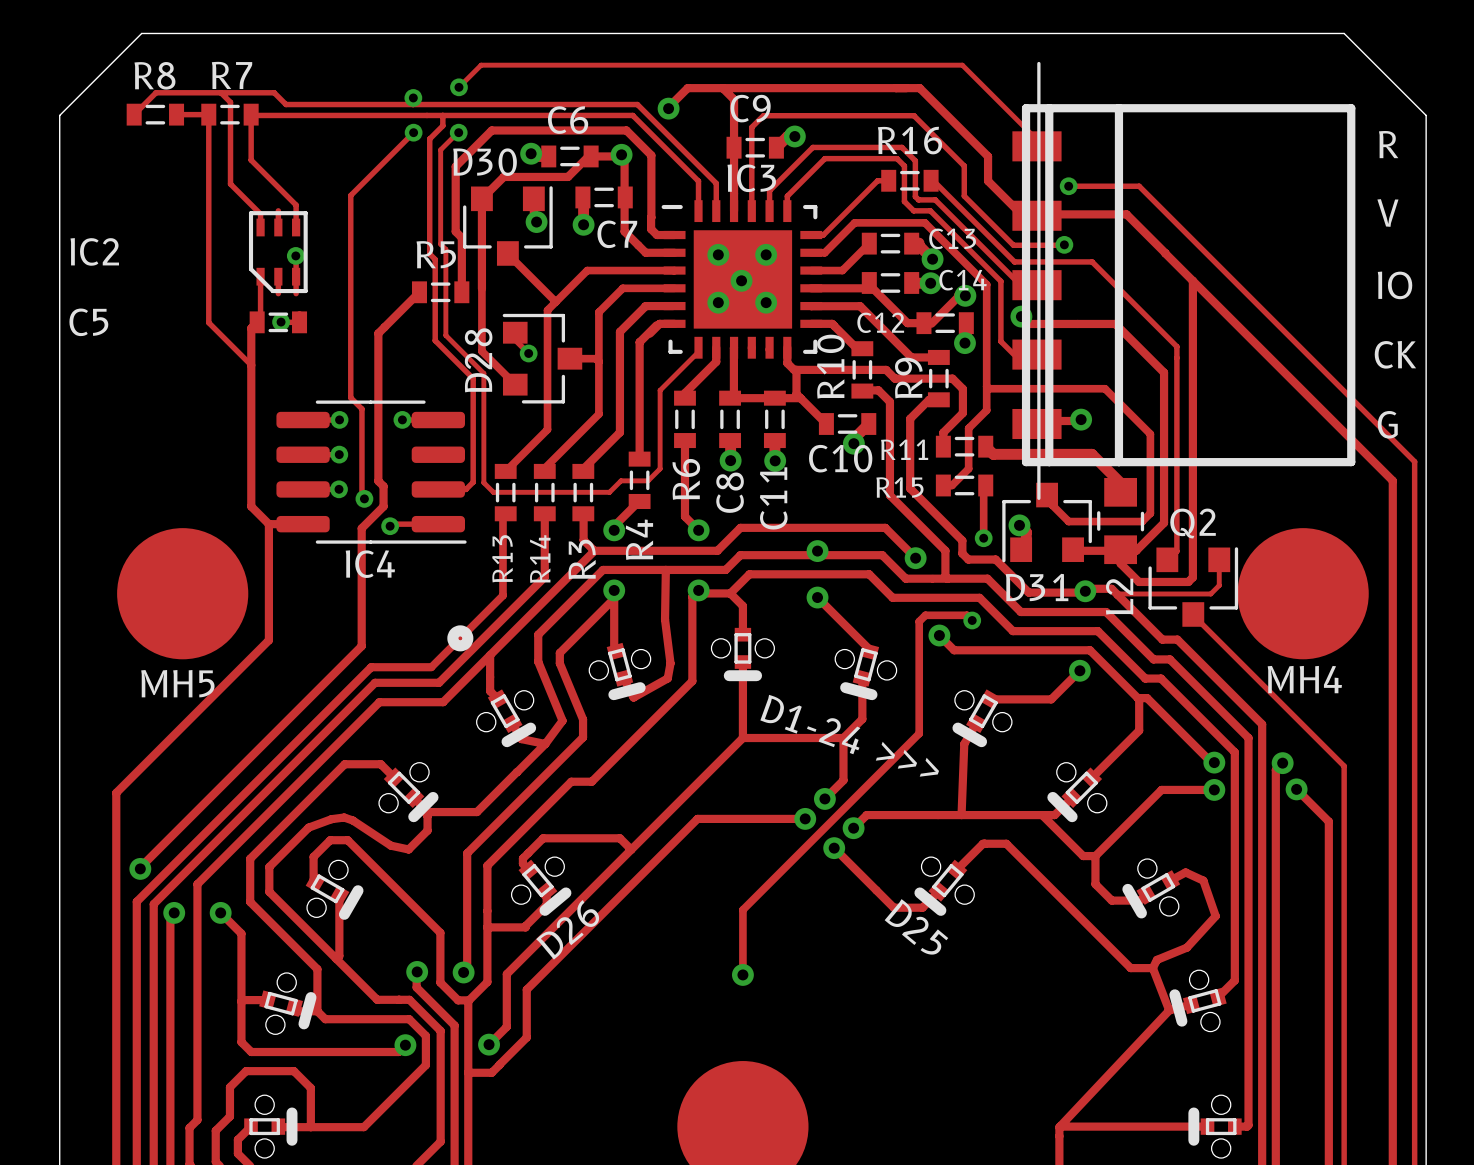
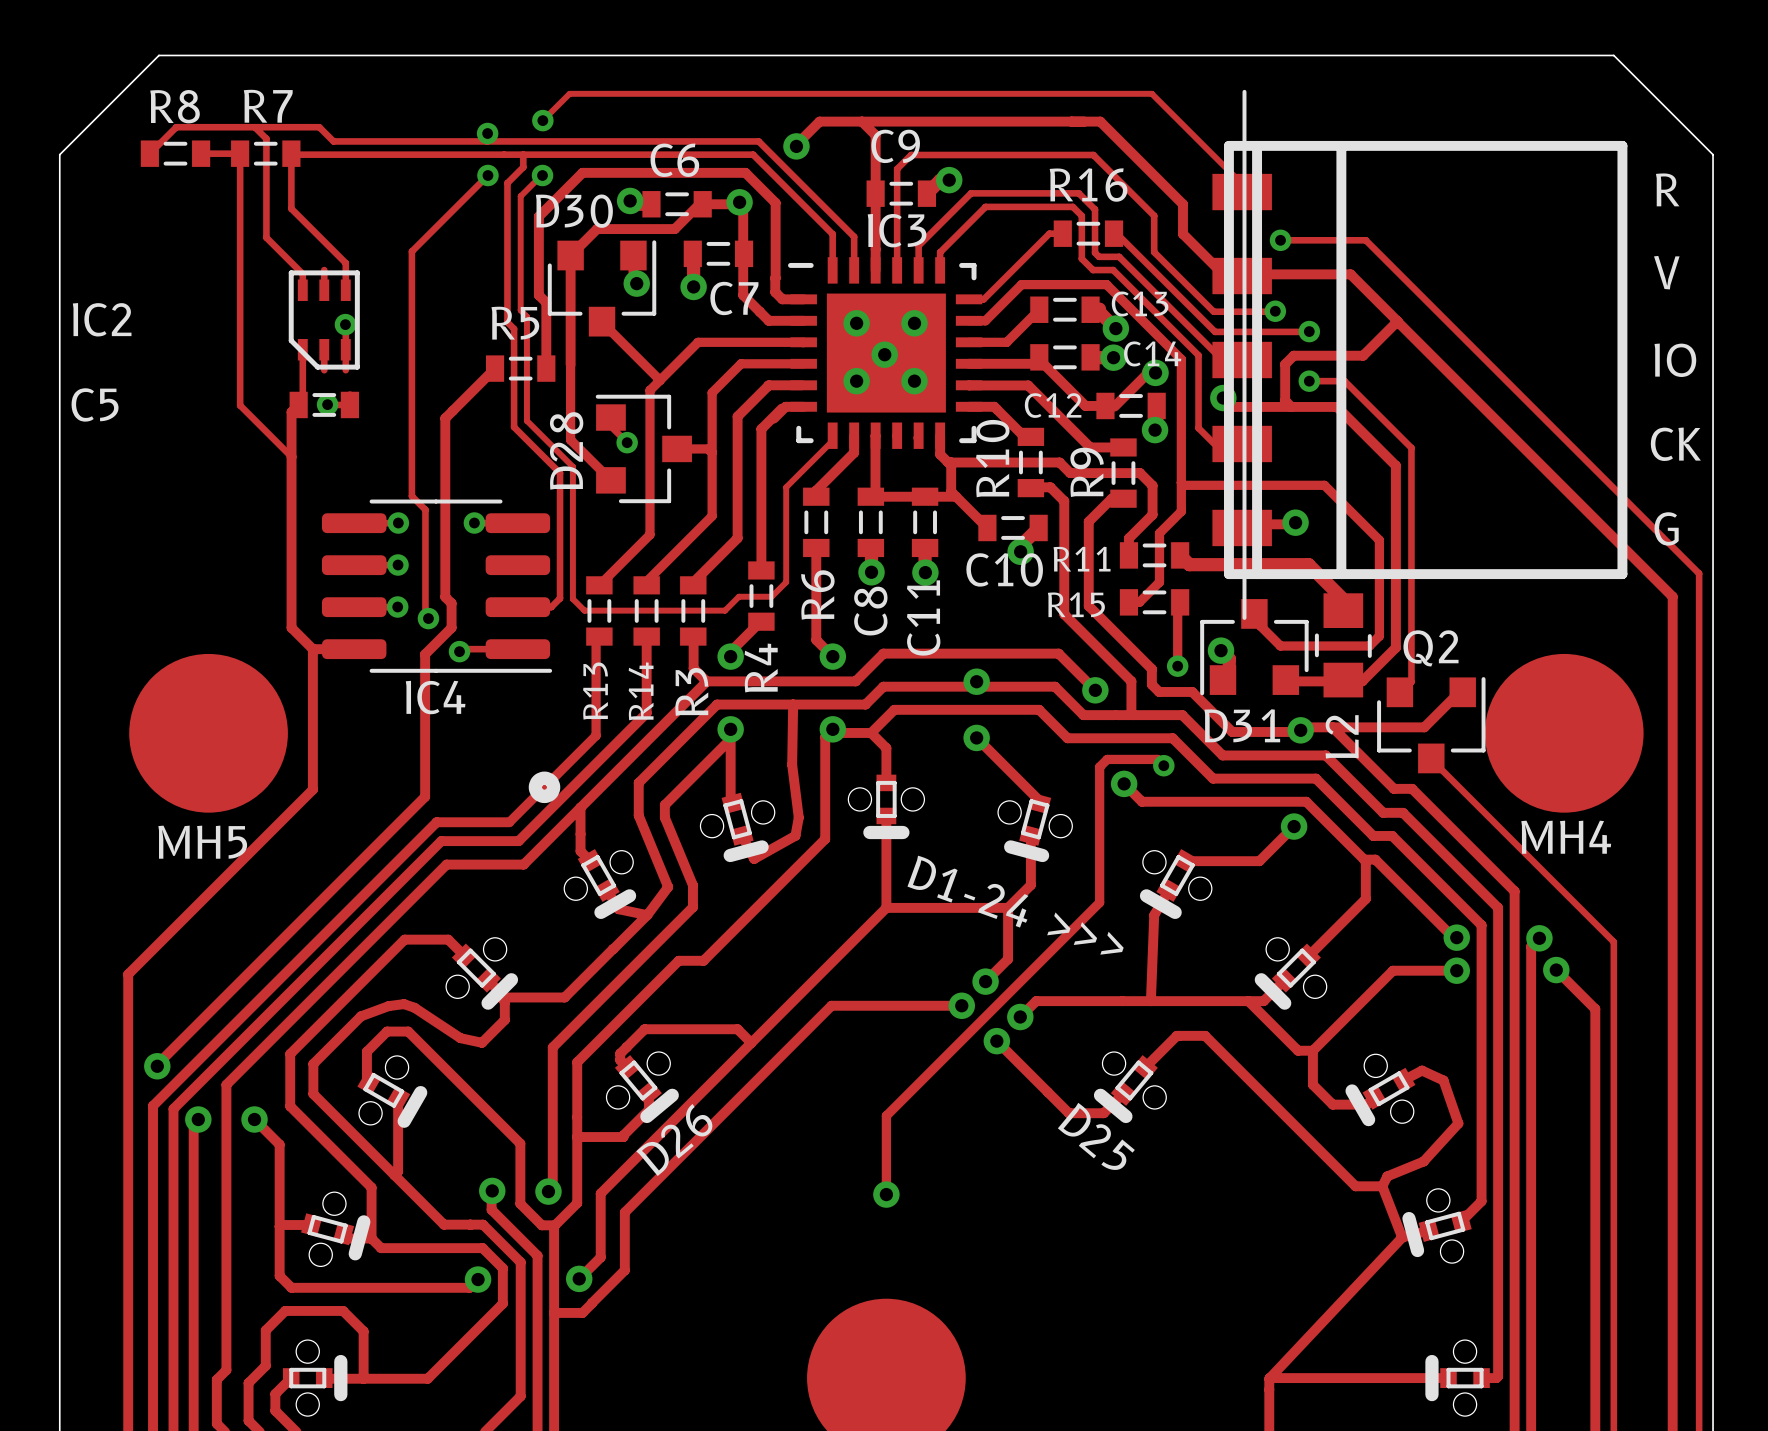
track: none -> (1397, 321) (1363, 355) (1293, 355) (1285, 364) (1285, 400) (1291, 406)
track: (1092, 261) (1176, 346) (1176, 357) -> (1309, 381) (1344, 381) (1411, 447)
via: none -> (1309, 331)
track: (1192, 280) (1192, 577) (1188, 581) (1138, 581) (1120, 563) (1120, 549) -> none
via: none -> (1309, 381)
track: none -> (1460, 691) (1424, 727) (1332, 727)
track: (1219, 559) (1219, 585) (1210, 593) (1117, 594) -> none

